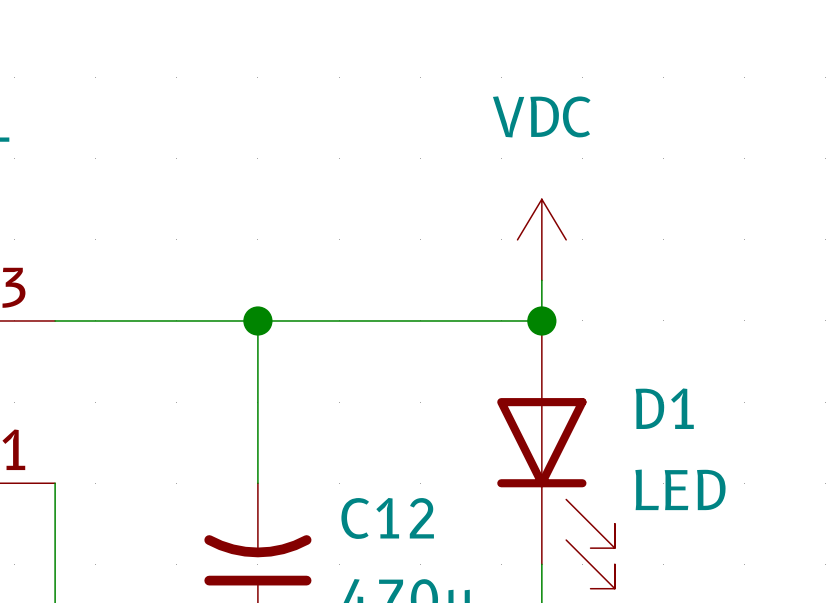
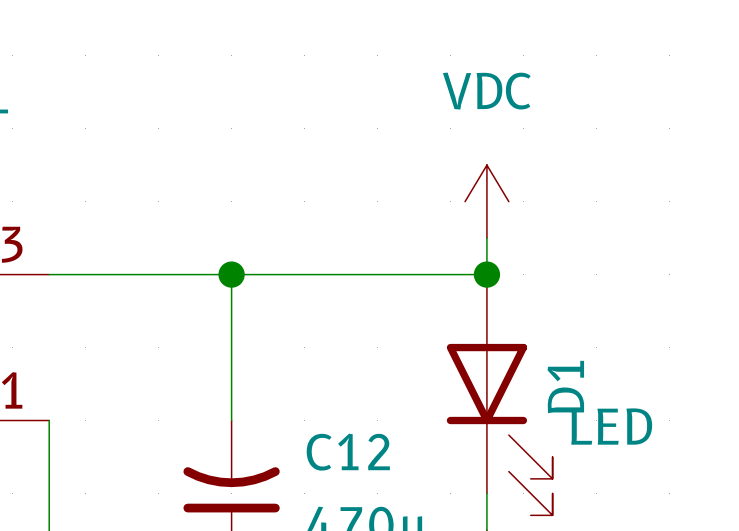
D1 name rotation: 0° (664, 408) -> 90° counterclockwise (565, 387)

